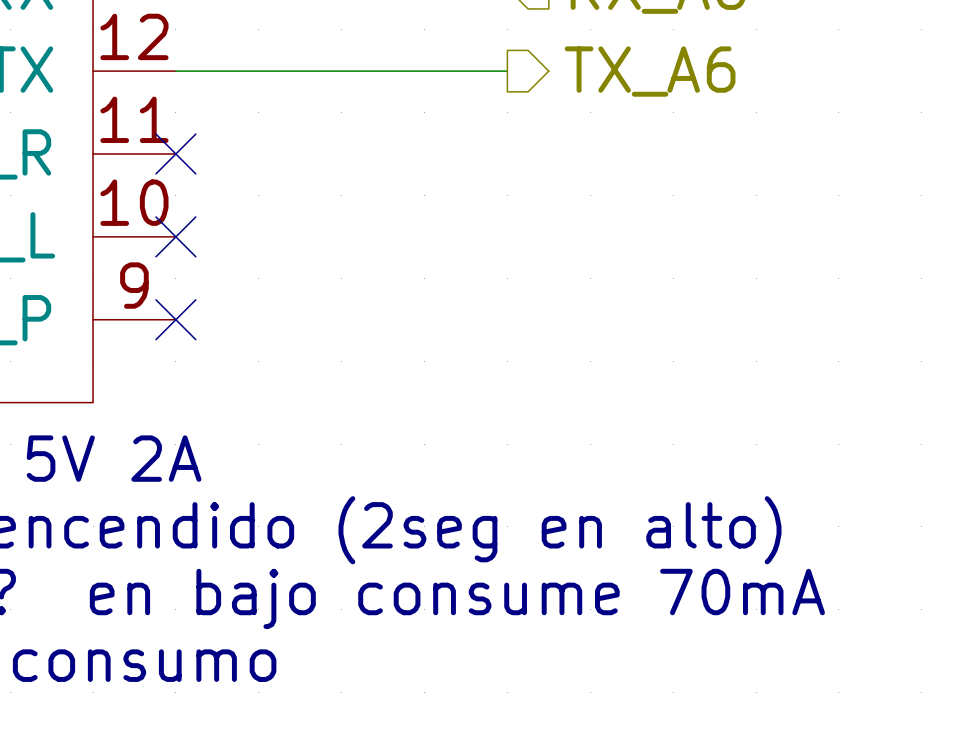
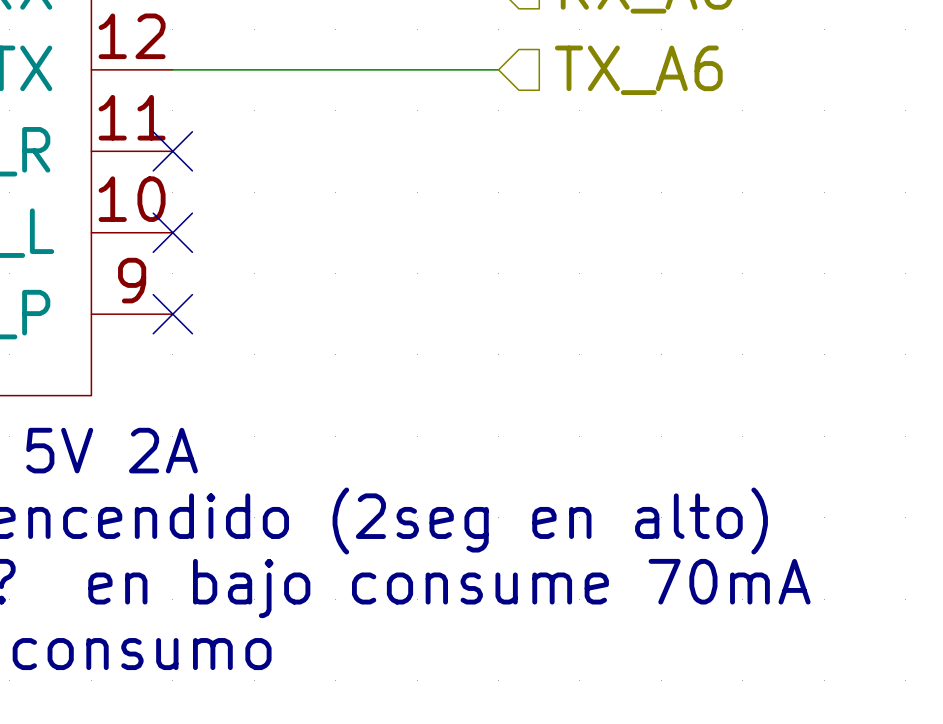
hierarchical label shape: output (650, 71) -> input (638, 70)

